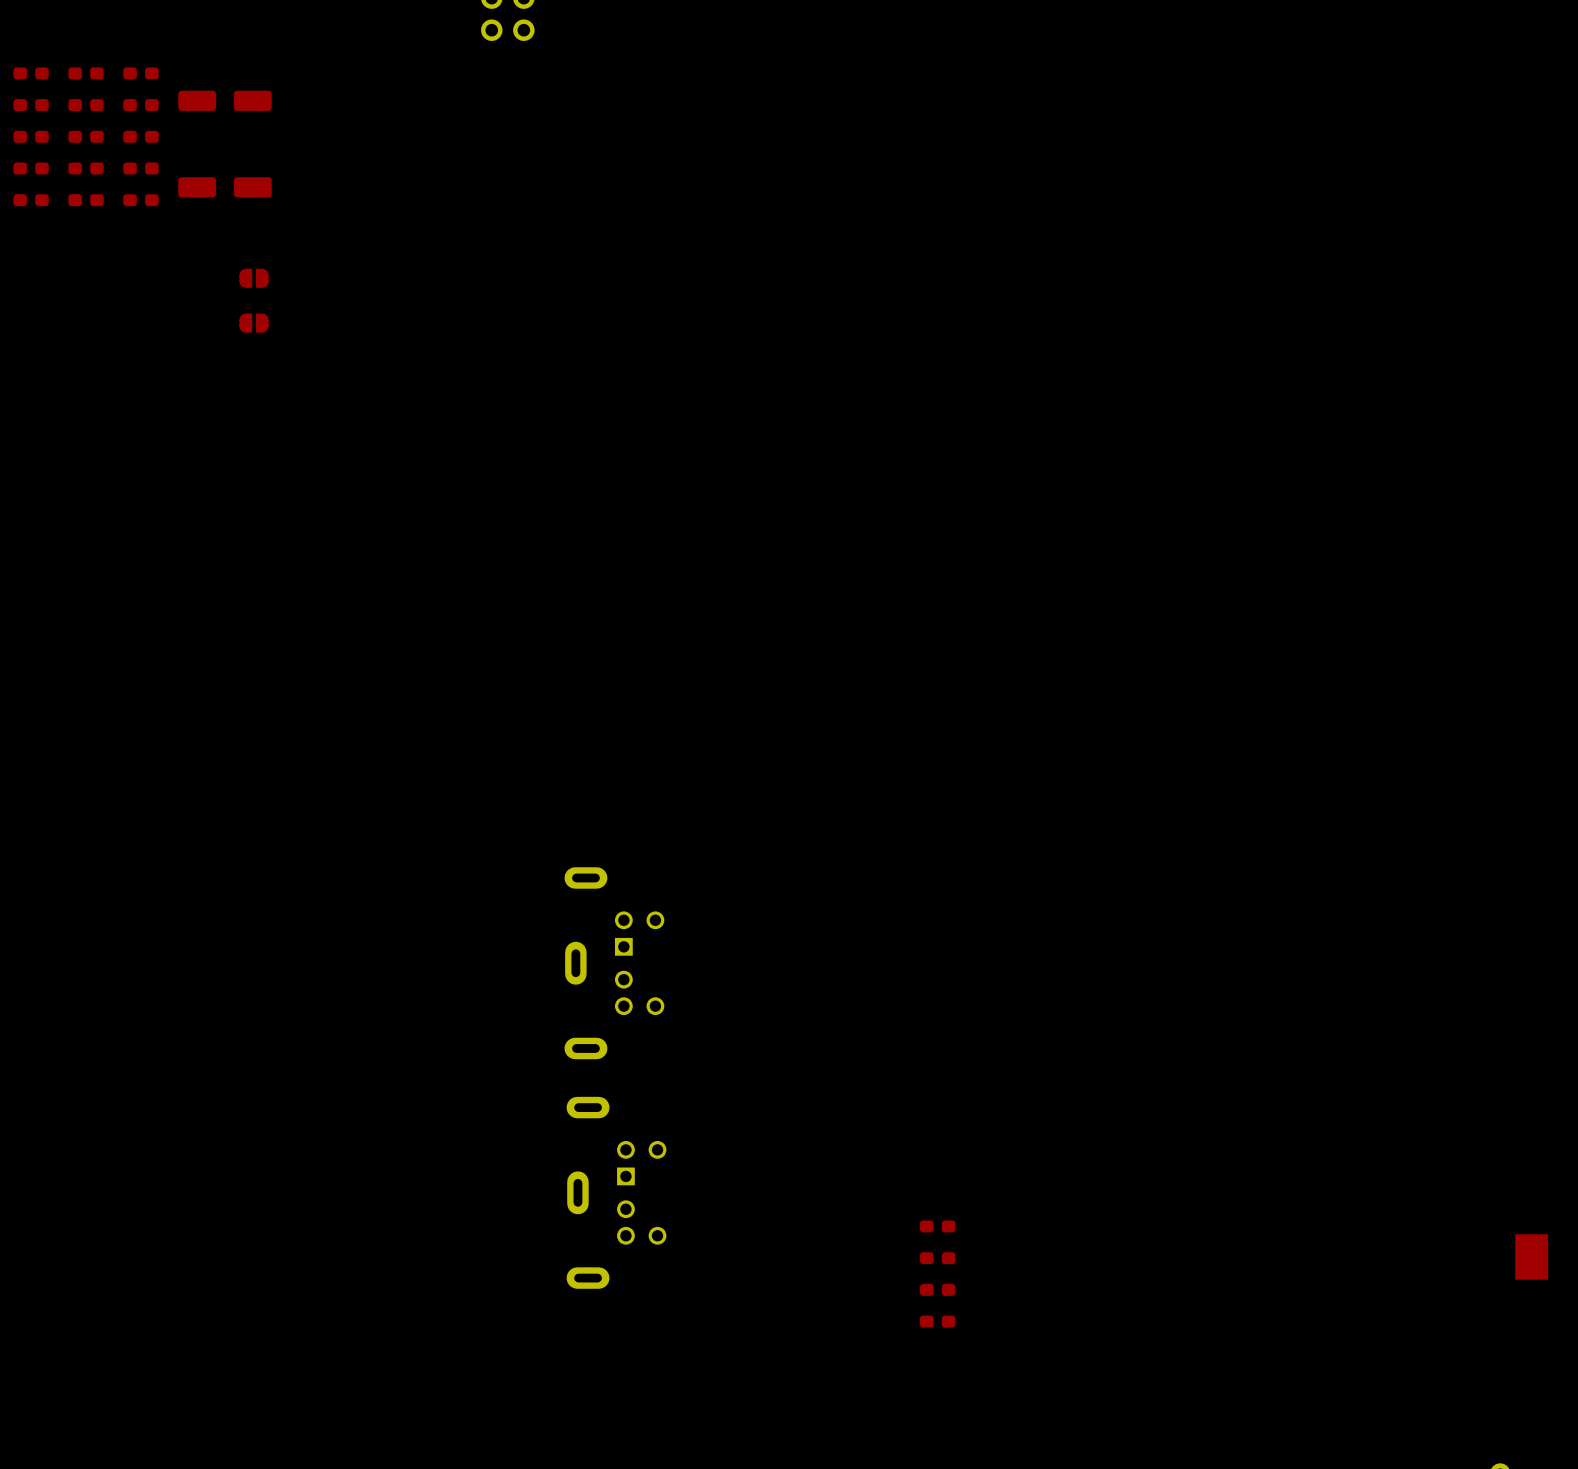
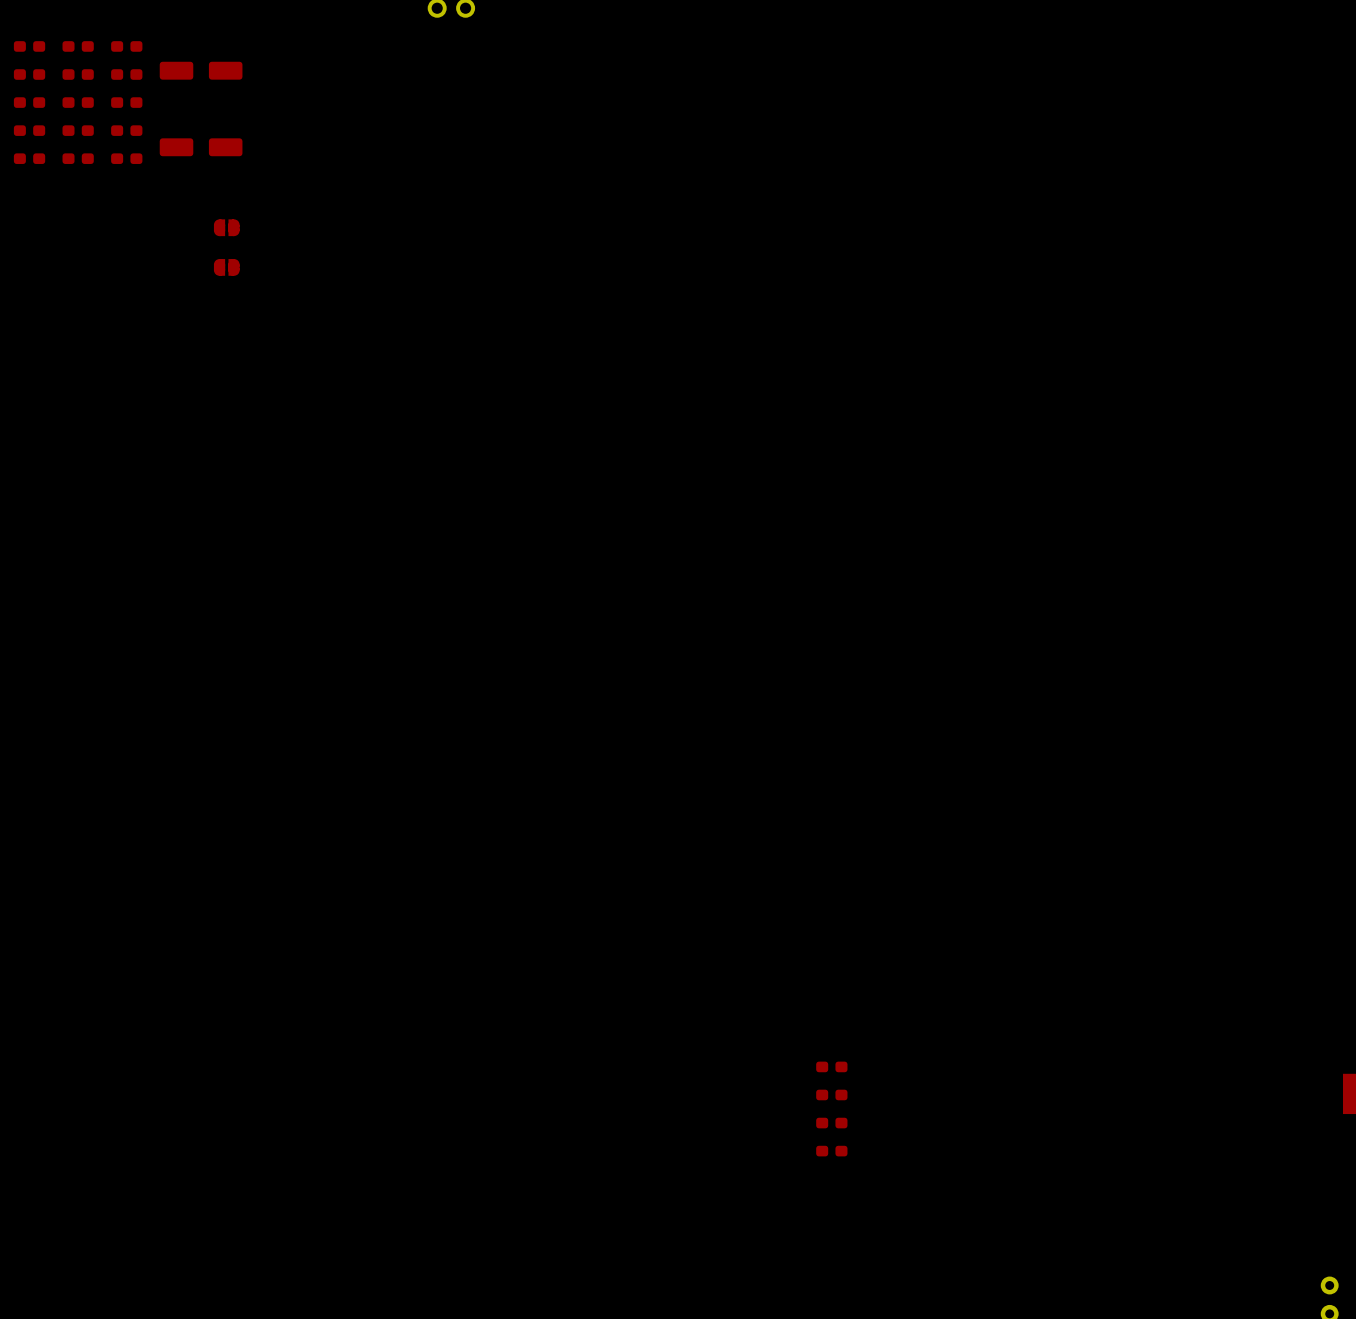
part: (614, 963) -> none
part: (616, 1192) -> none

